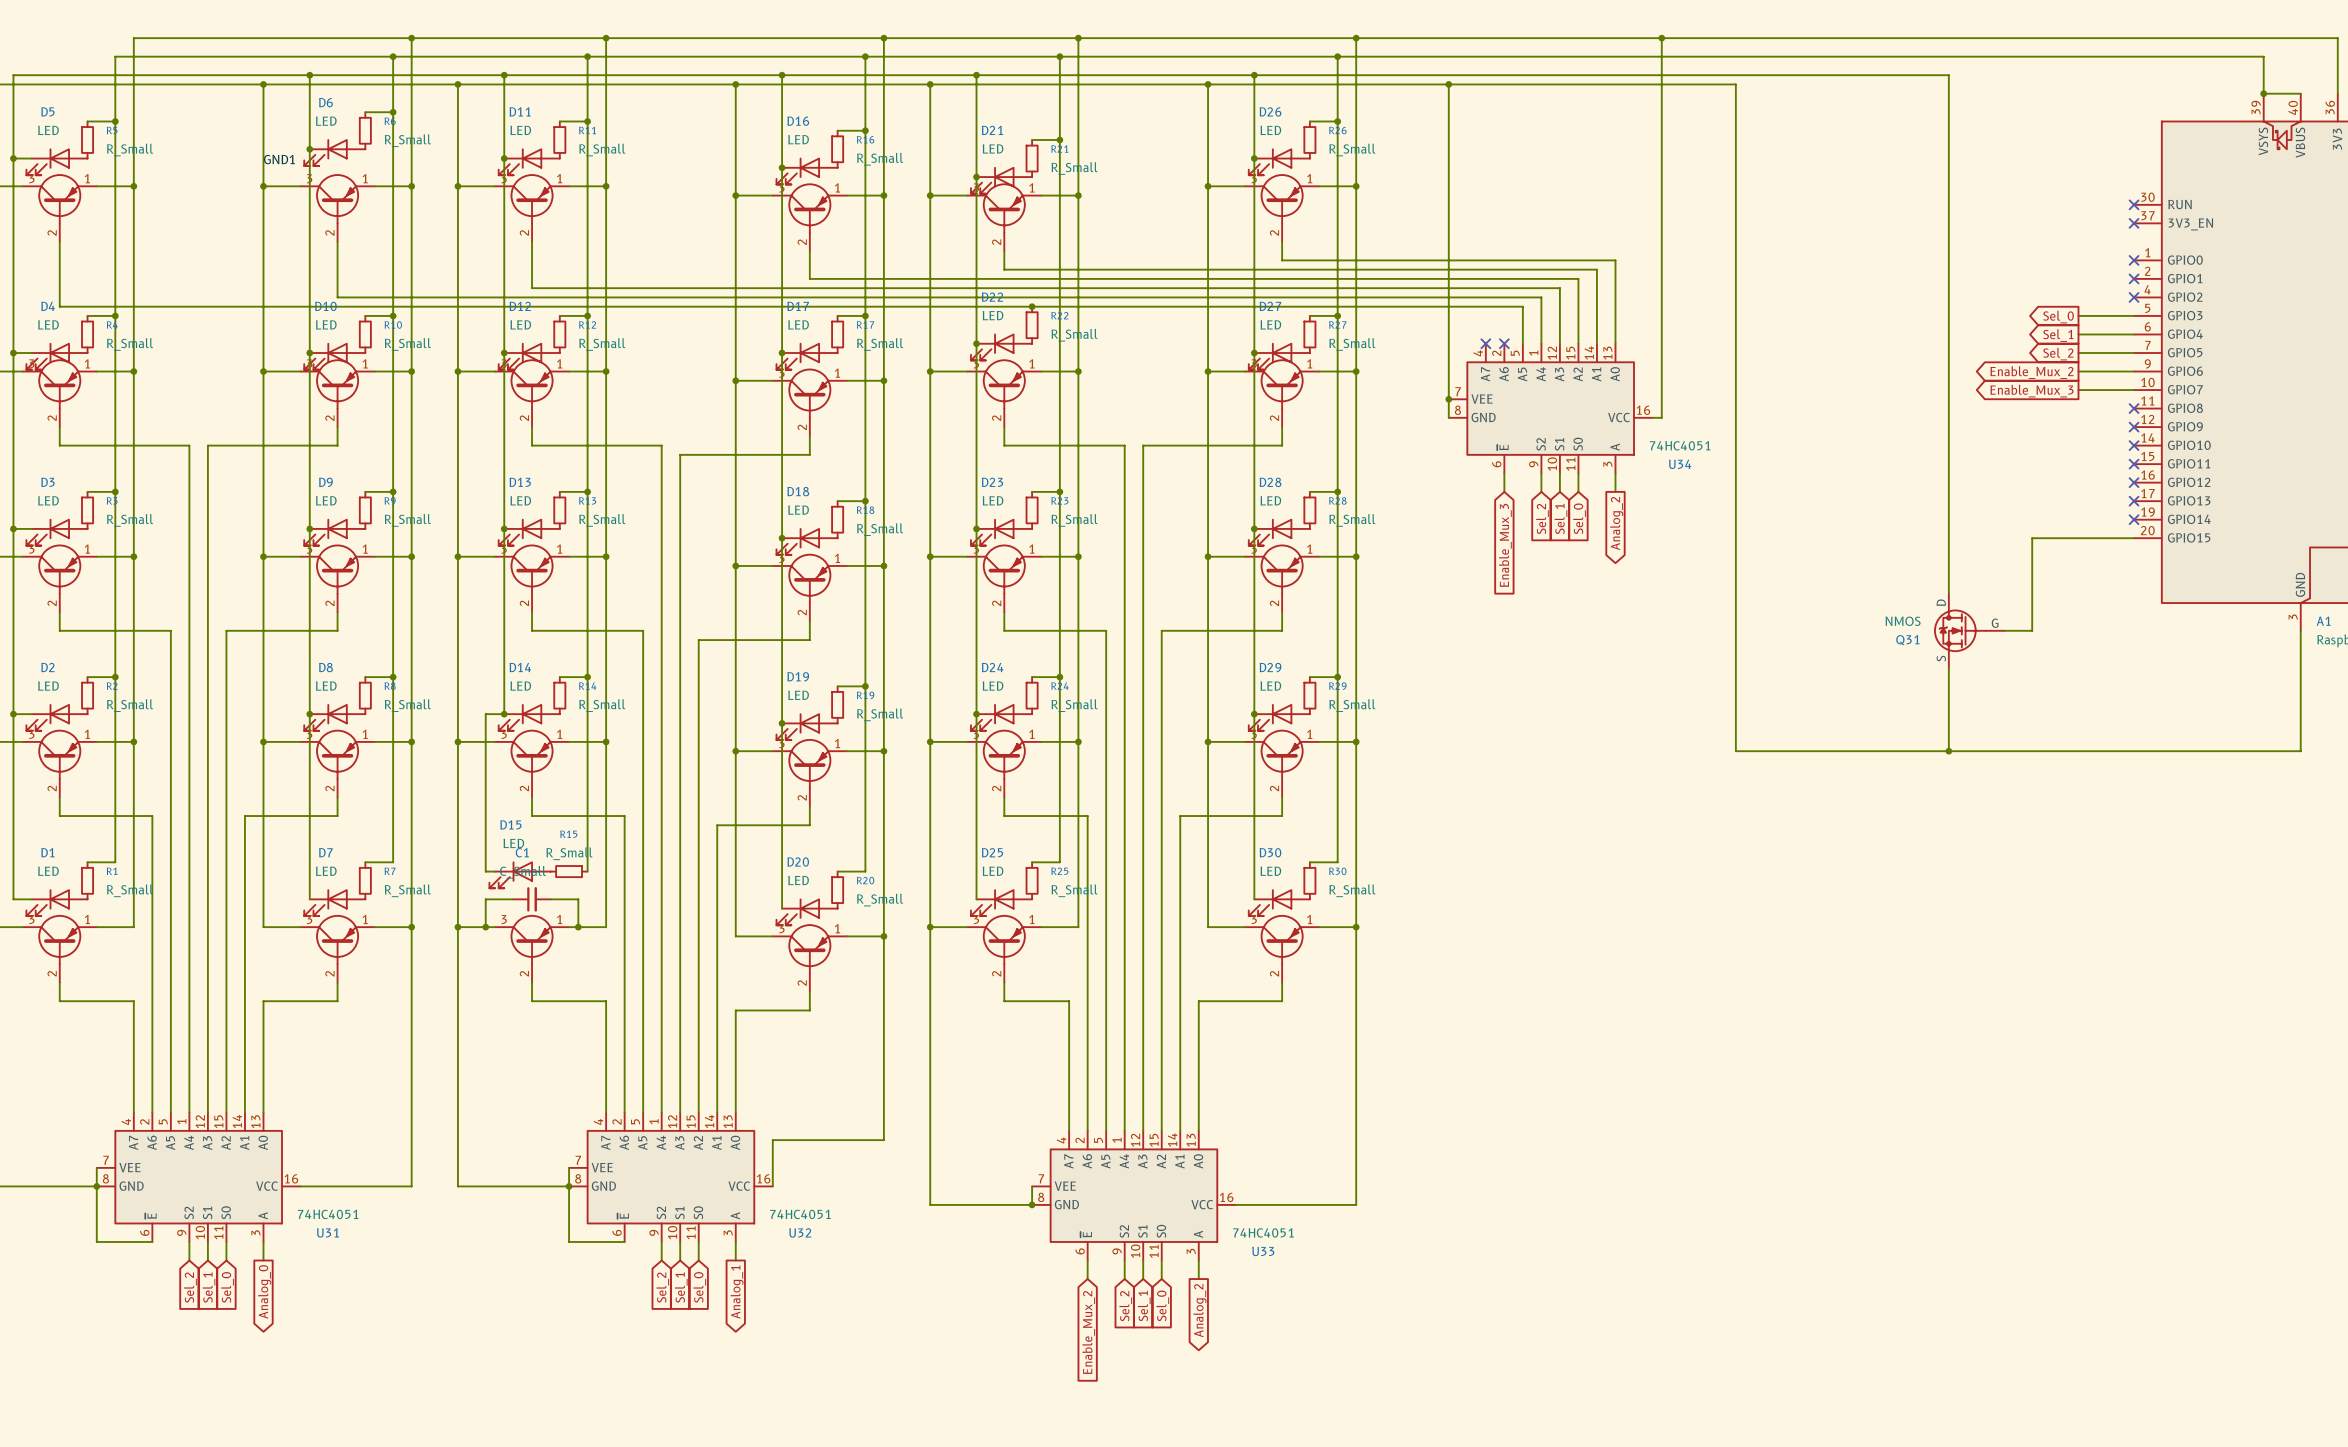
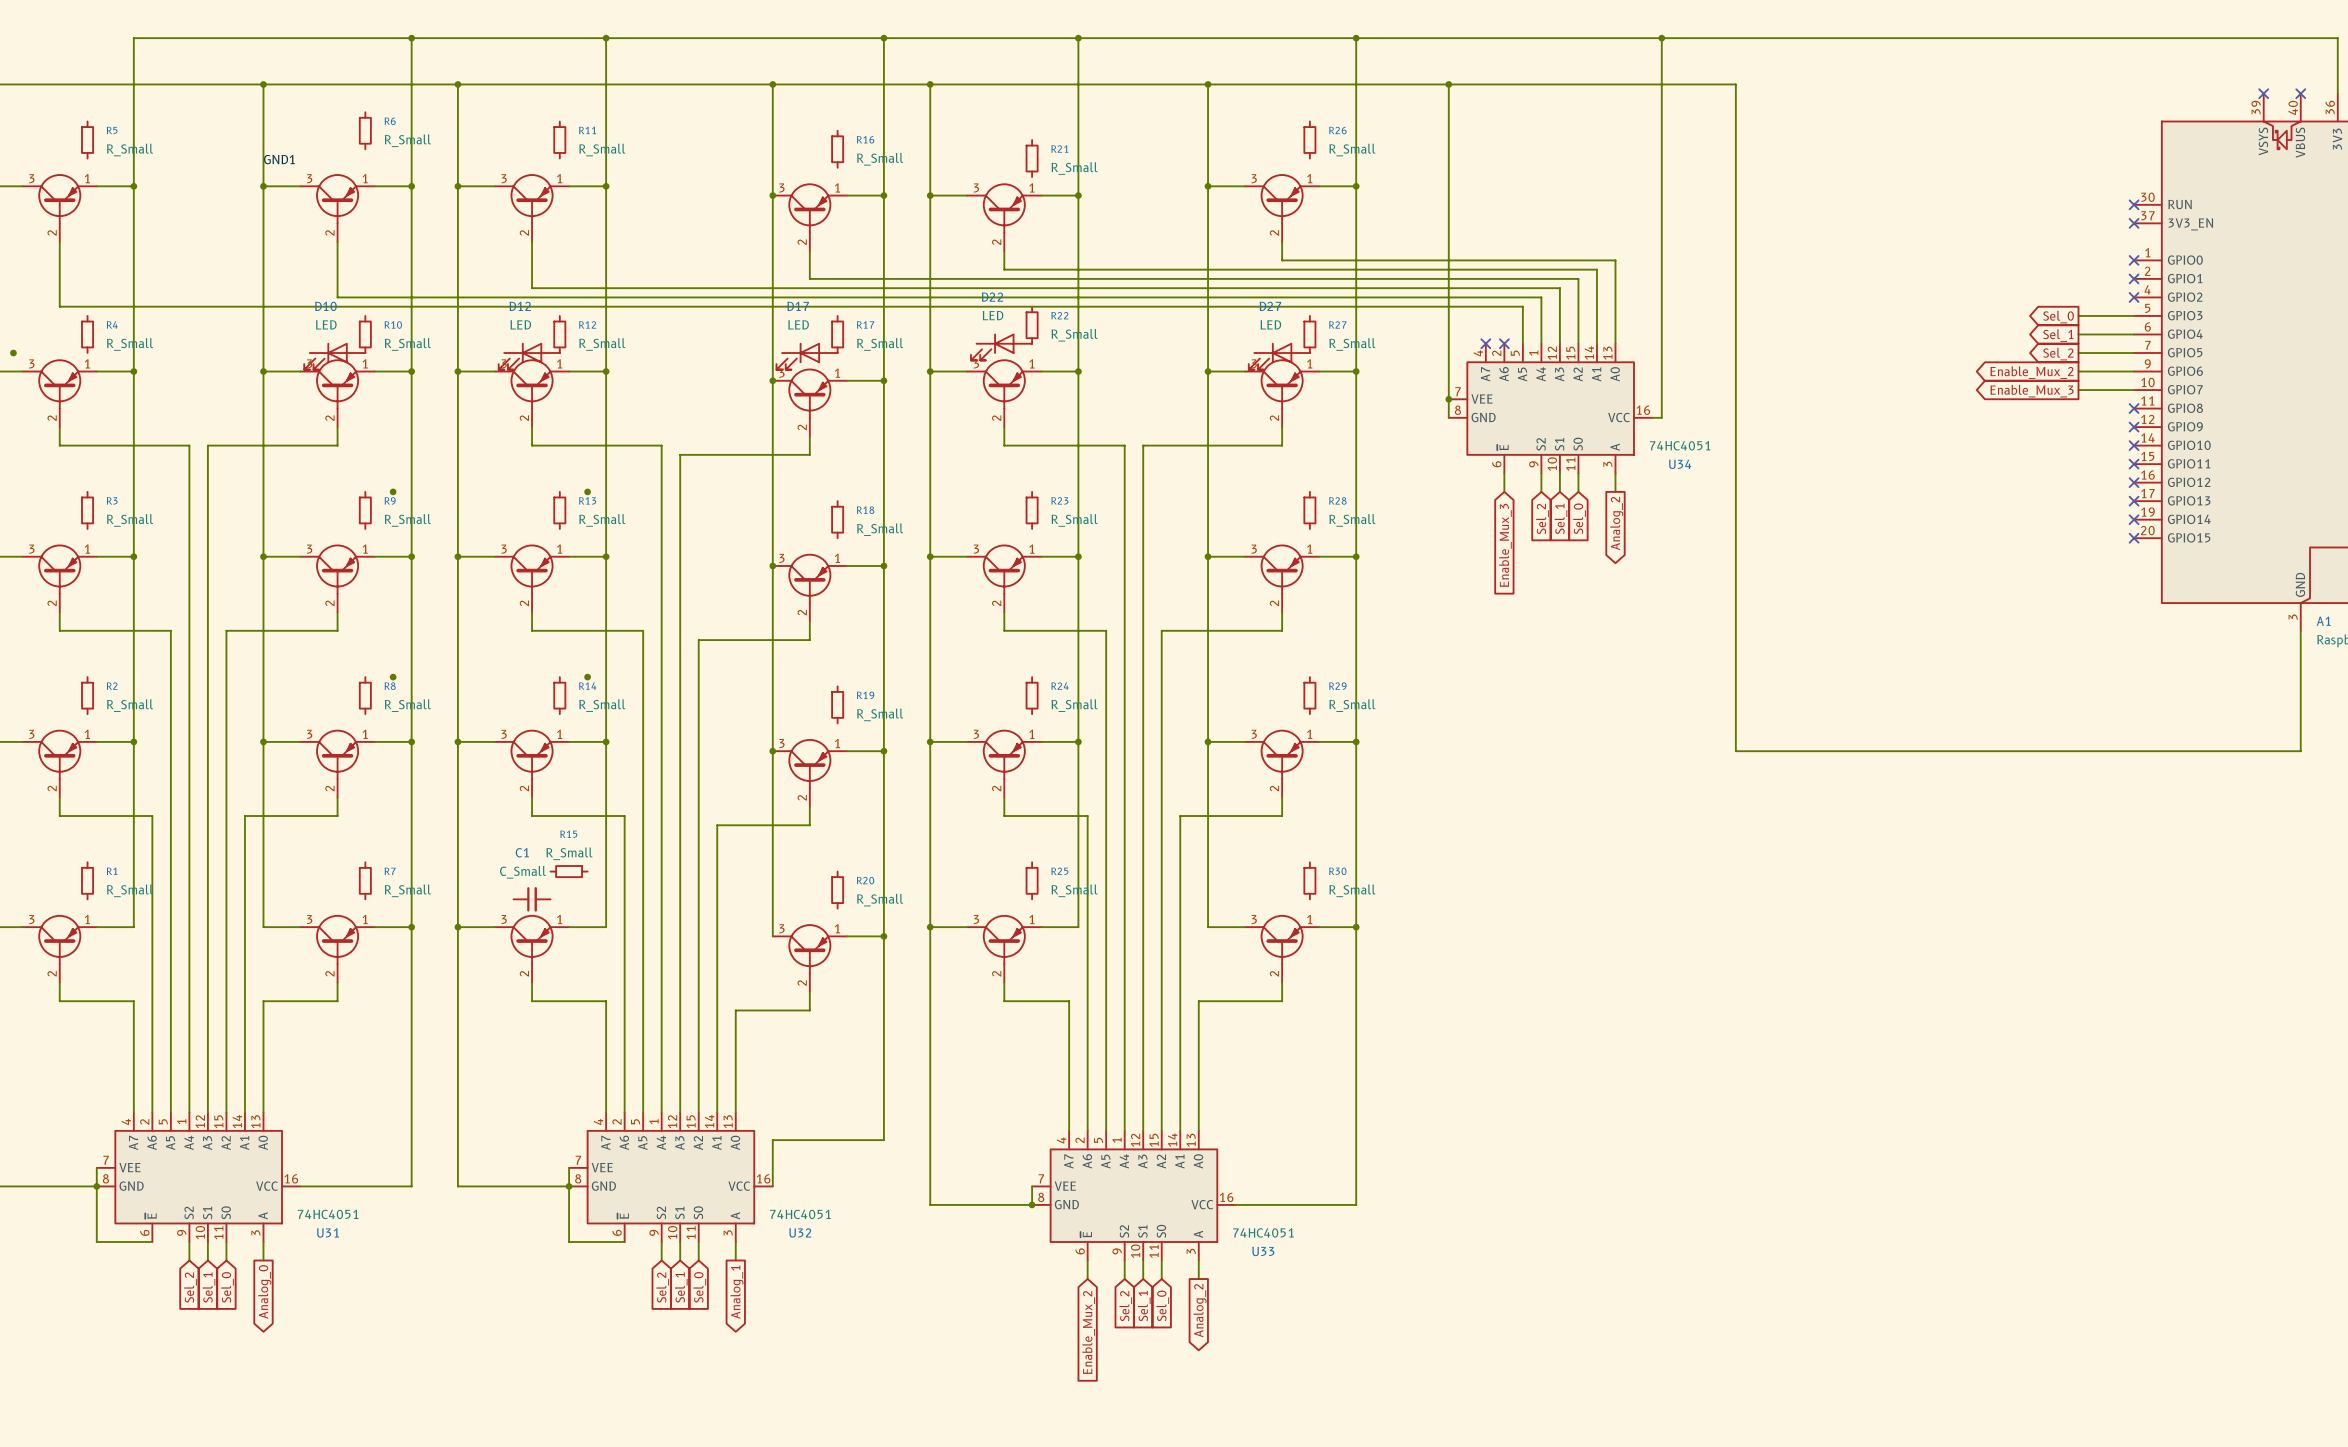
wire: (393, 56) (393, 862) (365, 862) -> none
junction: (393, 56) -> none
wire: (587, 56) (587, 871) -> none
junction: (587, 56) -> none
wire: (865, 56) (865, 871) (837, 871) -> none
junction: (865, 56) -> none
wire: (1059, 56) (1059, 862) (1032, 862) -> none
junction: (1059, 56) -> none
wire: (1337, 56) (1337, 862) (1309, 862) -> none
junction: (1337, 56) -> none
wire: (309, 75) (309, 899) -> none
junction: (309, 75) -> none
wire: (504, 75) (504, 714) (485, 714) (485, 871) (494, 871) -> none
junction: (504, 75) -> none
wire: (782, 75) (782, 908) -> none
junction position: (782, 75) -> (772, 84)
wire: (976, 75) (976, 899) -> none
junction: (976, 75) -> none
wire: (1254, 75) (1254, 899) -> none
junction: (1254, 75) -> none
wire: (735, 84) (735, 936) (772, 936) -> (772, 84) (772, 936)
junction: (735, 84) -> none
junction: (2263, 93) -> none
no-connect mark: none -> (2263, 93)
wire: (2300, 93) (2263, 93) (2263, 56) (115, 56) (115, 862) (87, 862) -> none
no-connect mark: none -> (2300, 93)
wire: (365, 112) (393, 112) -> none
junction: (393, 112) -> none
wire: (87, 121) (115, 121) -> none
junction: (115, 121) -> none
wire: (559, 121) (587, 121) -> none
junction: (587, 121) -> none
wire: (1309, 121) (1337, 121) -> none
junction: (1337, 121) -> none
wire: (837, 130) (865, 130) -> none
junction: (865, 130) -> none
wire: (1032, 140) (1059, 140) -> none
junction: (1059, 140) -> none
junction: (309, 149) -> none
D6: LED (334, 152) -> none
wire: (13, 158) (31, 158) -> none
junction: (13, 158) -> none
junction: (504, 158) -> none
junction: (1254, 158) -> none
D5: LED (56, 161) -> none
D11: LED (529, 161) -> none
D26: LED (1279, 161) -> none
junction: (782, 167) -> none
D16: LED (807, 171) -> none
junction: (976, 177) -> none
D21: LED (1001, 180) -> none
wire: (735, 195) (772, 195) -> none
junction: (735, 195) -> none
junction: none -> (772, 195)
junction: (1032, 306) -> none
wire: (87, 315) (115, 315) -> none
junction: (115, 315) -> none
wire: (365, 315) (393, 315) -> none
junction: (393, 315) -> none
wire: (559, 315) (587, 315) -> none
junction: (587, 315) -> none
wire: (837, 315) (865, 315) -> none
junction: (865, 315) -> none
wire: (1309, 315) (1337, 315) -> none
junction: (1337, 315) -> none
junction: (976, 343) -> none
wire: (13, 353) (31, 353) -> none
junction: (309, 353) -> none
junction: (504, 353) -> none
junction: (782, 353) -> none
junction: (1254, 353) -> none
D4: LED (56, 356) -> none
wire: (735, 380) (772, 380) -> none
junction: (735, 380) -> none
junction: none -> (772, 380)
wire: (87, 491) (115, 491) -> none
junction: (115, 491) -> none
wire: (365, 491) (393, 491) -> none
wire: (559, 491) (587, 491) -> none
wire: (1032, 491) (1059, 491) -> none
junction: (1059, 491) -> none
wire: (1309, 491) (1337, 491) -> none
junction: (1337, 491) -> none
wire: (837, 501) (865, 501) -> none
junction: (865, 501) -> none
wire: (13, 528) (31, 528) -> none
junction: (13, 528) -> none
junction: (309, 528) -> none
junction: (504, 528) -> none
junction: (976, 528) -> none
junction: (1254, 528) -> none
D3: LED (56, 532) -> none
D9: LED (334, 532) -> none
D13: LED (529, 532) -> none
D23: LED (1001, 532) -> none
D28: LED (1279, 532) -> none
junction: (782, 538) -> none
wire: (2134, 538) (2032, 538) (2032, 630) (2004, 630) -> none
no-connect mark: none -> (2134, 538)
D18: LED (807, 541) -> none
wire: (735, 565) (772, 565) -> none
junction: (735, 565) -> none
junction: none -> (772, 565)
wire: (1948, 593) (1948, 75) (13, 75) (13, 899) (31, 899) -> none
Q31: NMOS (1969, 630) -> none
wire: (1948, 667) (1948, 751) -> none
wire: (87, 677) (115, 677) -> none
junction: (115, 677) -> none
wire: (365, 677) (393, 677) -> none
wire: (559, 677) (587, 677) -> none
wire: (1032, 677) (1059, 677) -> none
junction: (1059, 677) -> none
wire: (1309, 677) (1337, 677) -> none
junction: (1337, 677) -> none
wire: (837, 686) (865, 686) -> none
junction: (865, 686) -> none
wire: (13, 714) (31, 714) -> none
junction: (13, 714) -> none
junction: (309, 714) -> none
junction: (504, 714) -> none
junction: (976, 714) -> none
junction: (1254, 714) -> none
D2: LED (56, 717) -> none
D8: LED (334, 717) -> none
D14: LED (529, 717) -> none
D24: LED (1001, 717) -> none
D29: LED (1279, 717) -> none
junction: (782, 723) -> none
D19: LED (807, 726) -> none
wire: (735, 751) (772, 751) -> none
junction: (735, 751) -> none
junction: none -> (772, 751)
junction: (1948, 751) -> none
D15: LED (519, 874) -> none
wire: (513, 899) (485, 899) (485, 927) -> none
wire: (550, 899) (578, 899) (578, 927) -> none
D1: LED (56, 902) -> none
D7: LED (334, 902) -> none
D25: LED (1001, 902) -> none
D30: LED (1279, 902) -> none
D20: LED (807, 911) -> none
junction: (485, 927) -> none
junction: (578, 927) -> none

